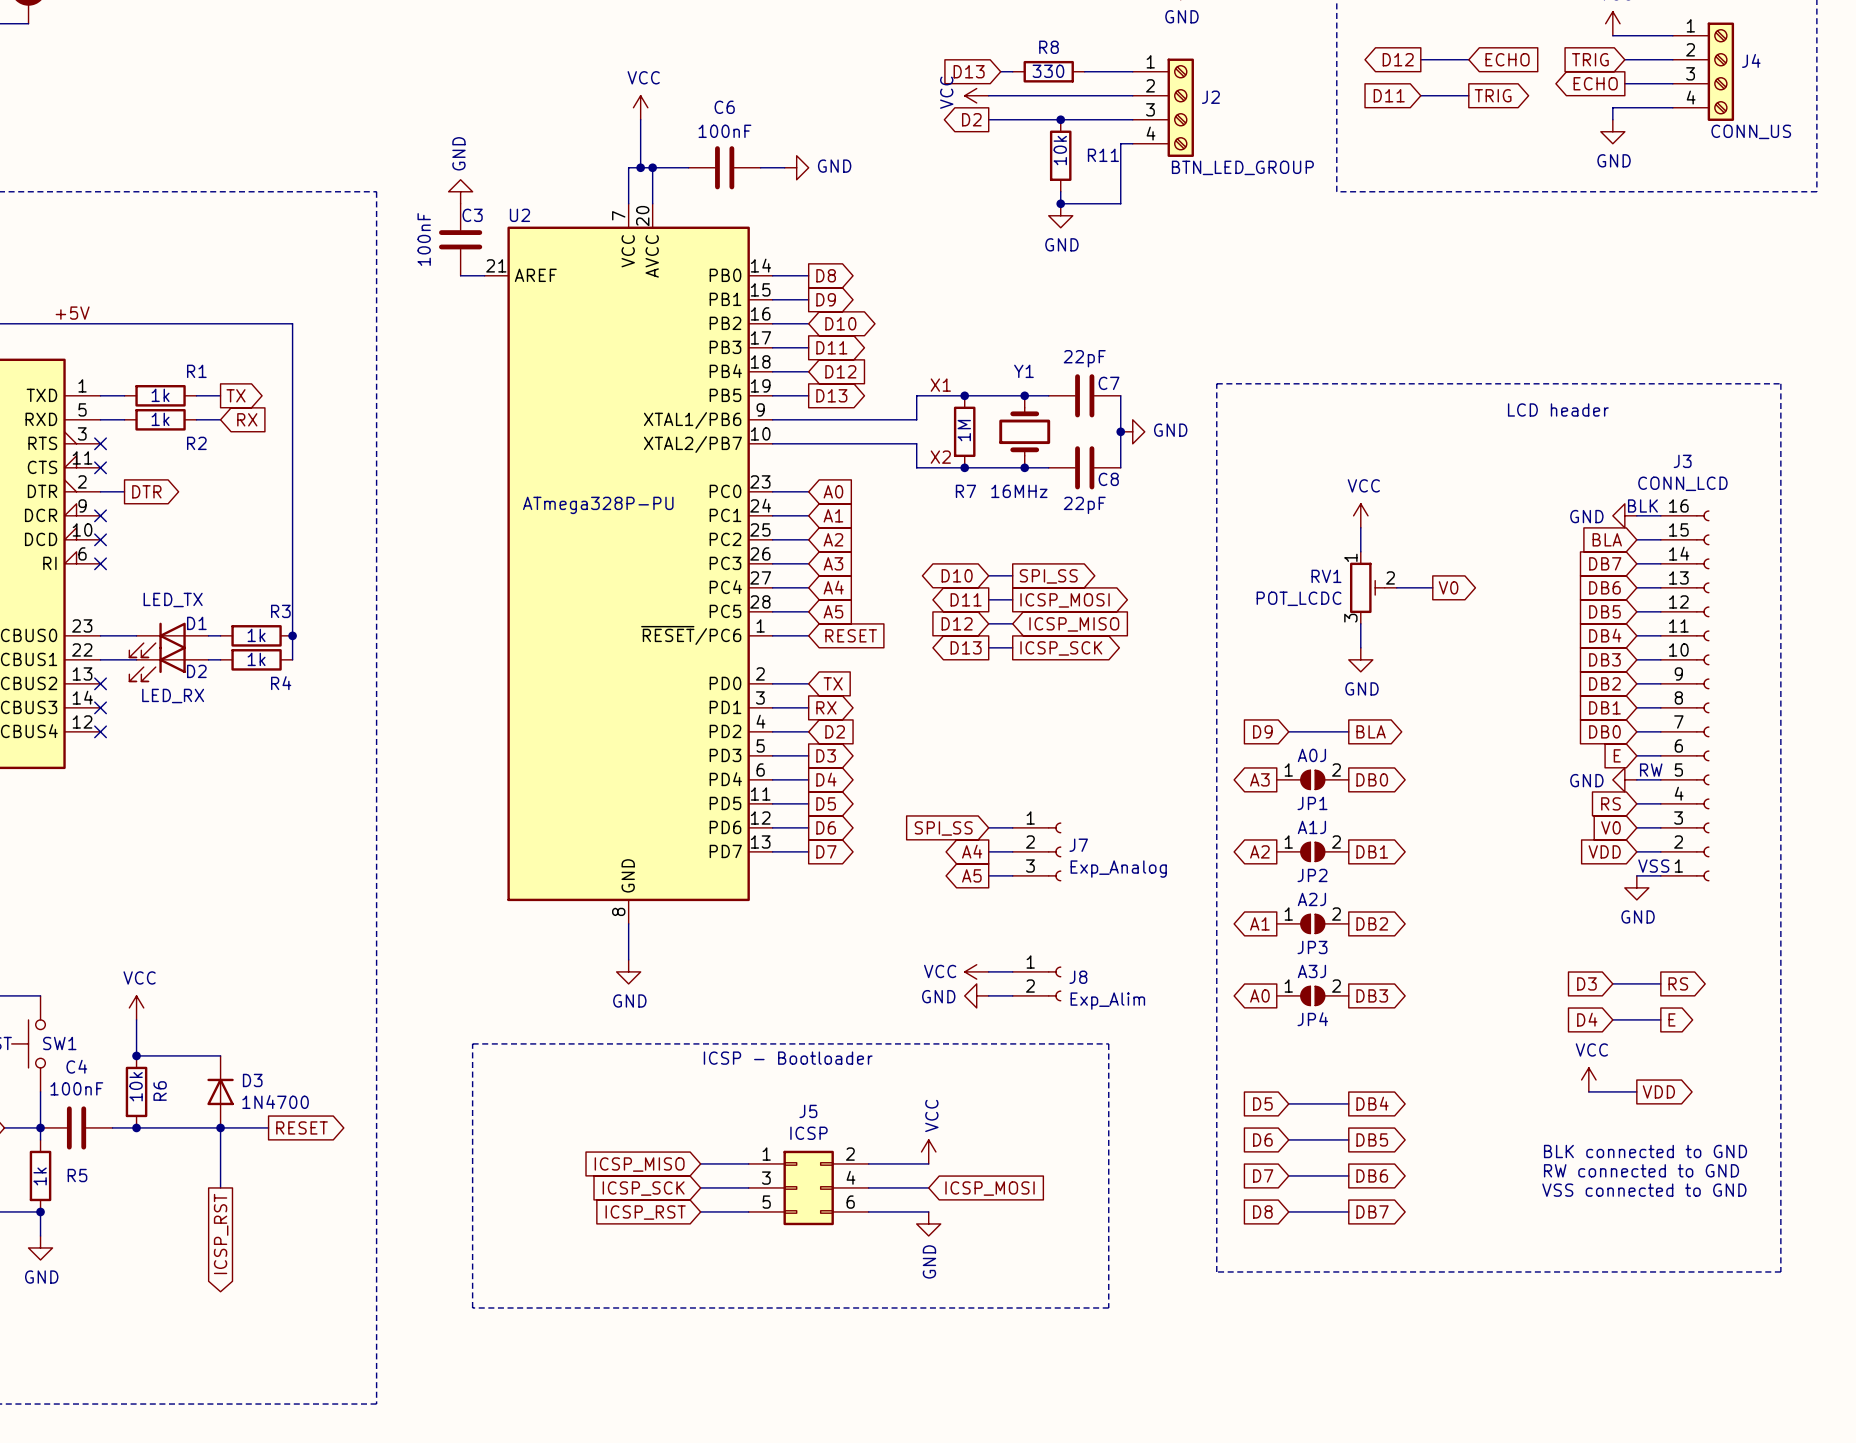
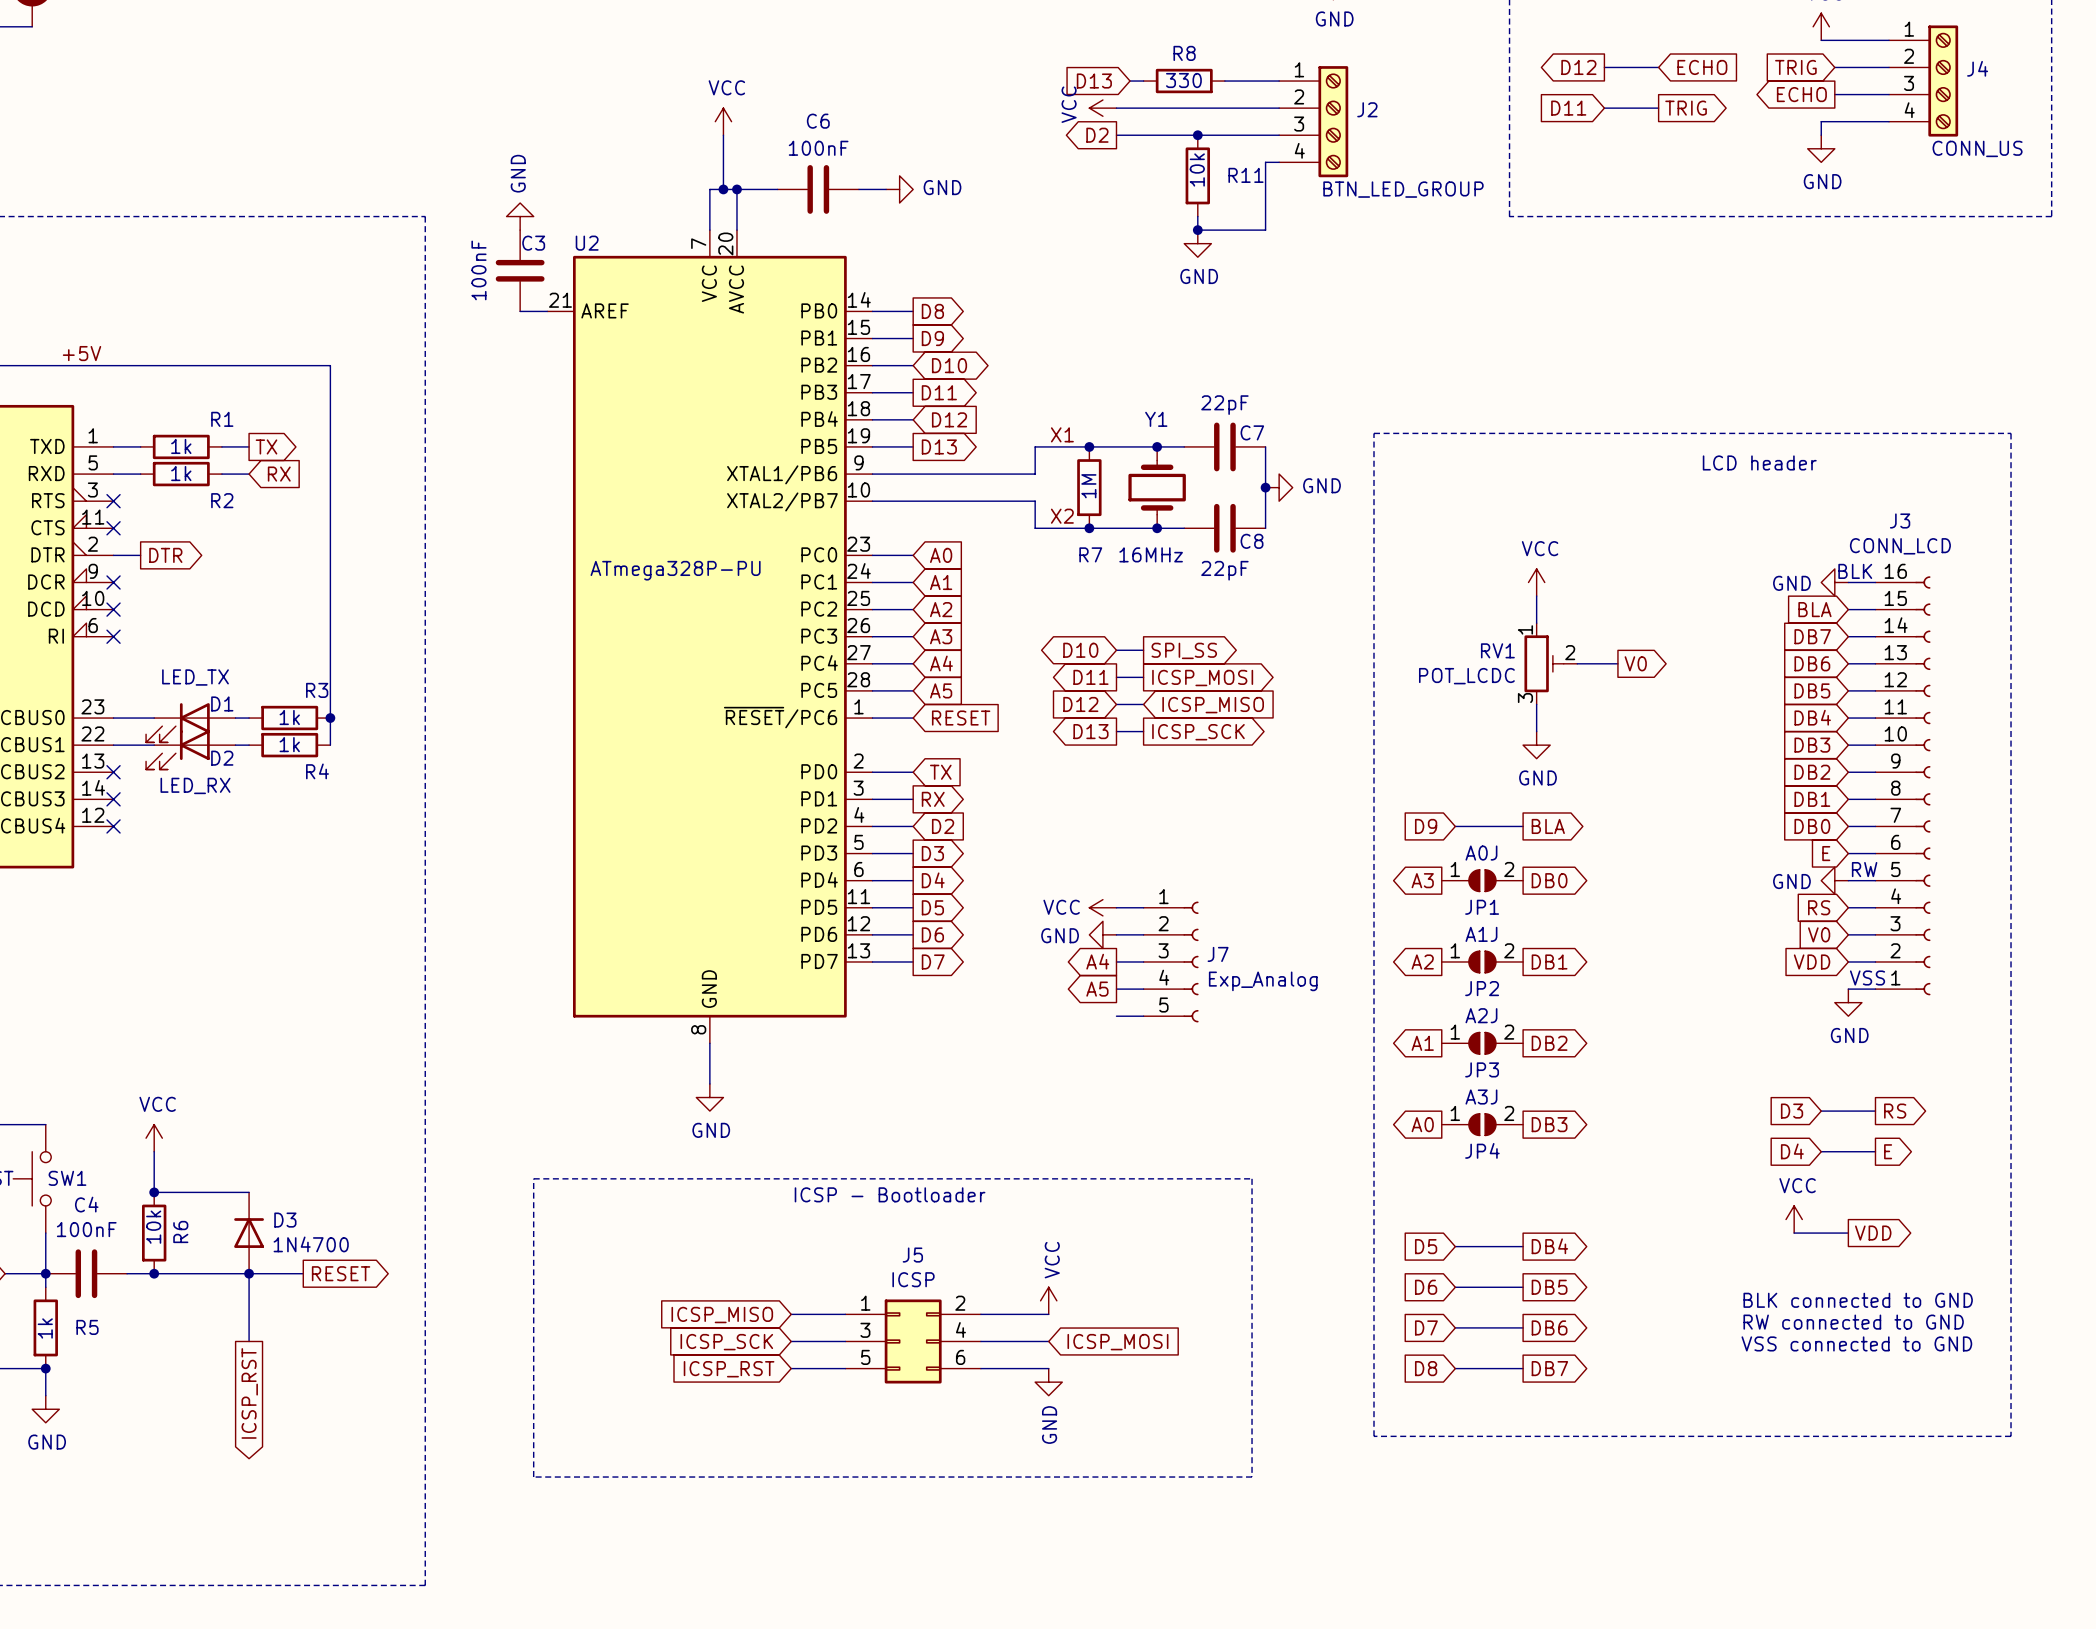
J7 symbol: [1012, 822, 1062, 882] -> [1143, 901, 1199, 1023]
global label: SPI_SS (943, 828) -> none
power symbol position: VCC (976, 971) -> VCC (1102, 907)
wire: (988, 971) (1012, 971) -> (1116, 1016) (1143, 1016)
J8: Exp_Alim (1037, 983) -> none
power symbol position: GND (976, 995) -> GND (1102, 934)
wire: (988, 995) (1012, 995) -> (1116, 907) (1143, 907)

